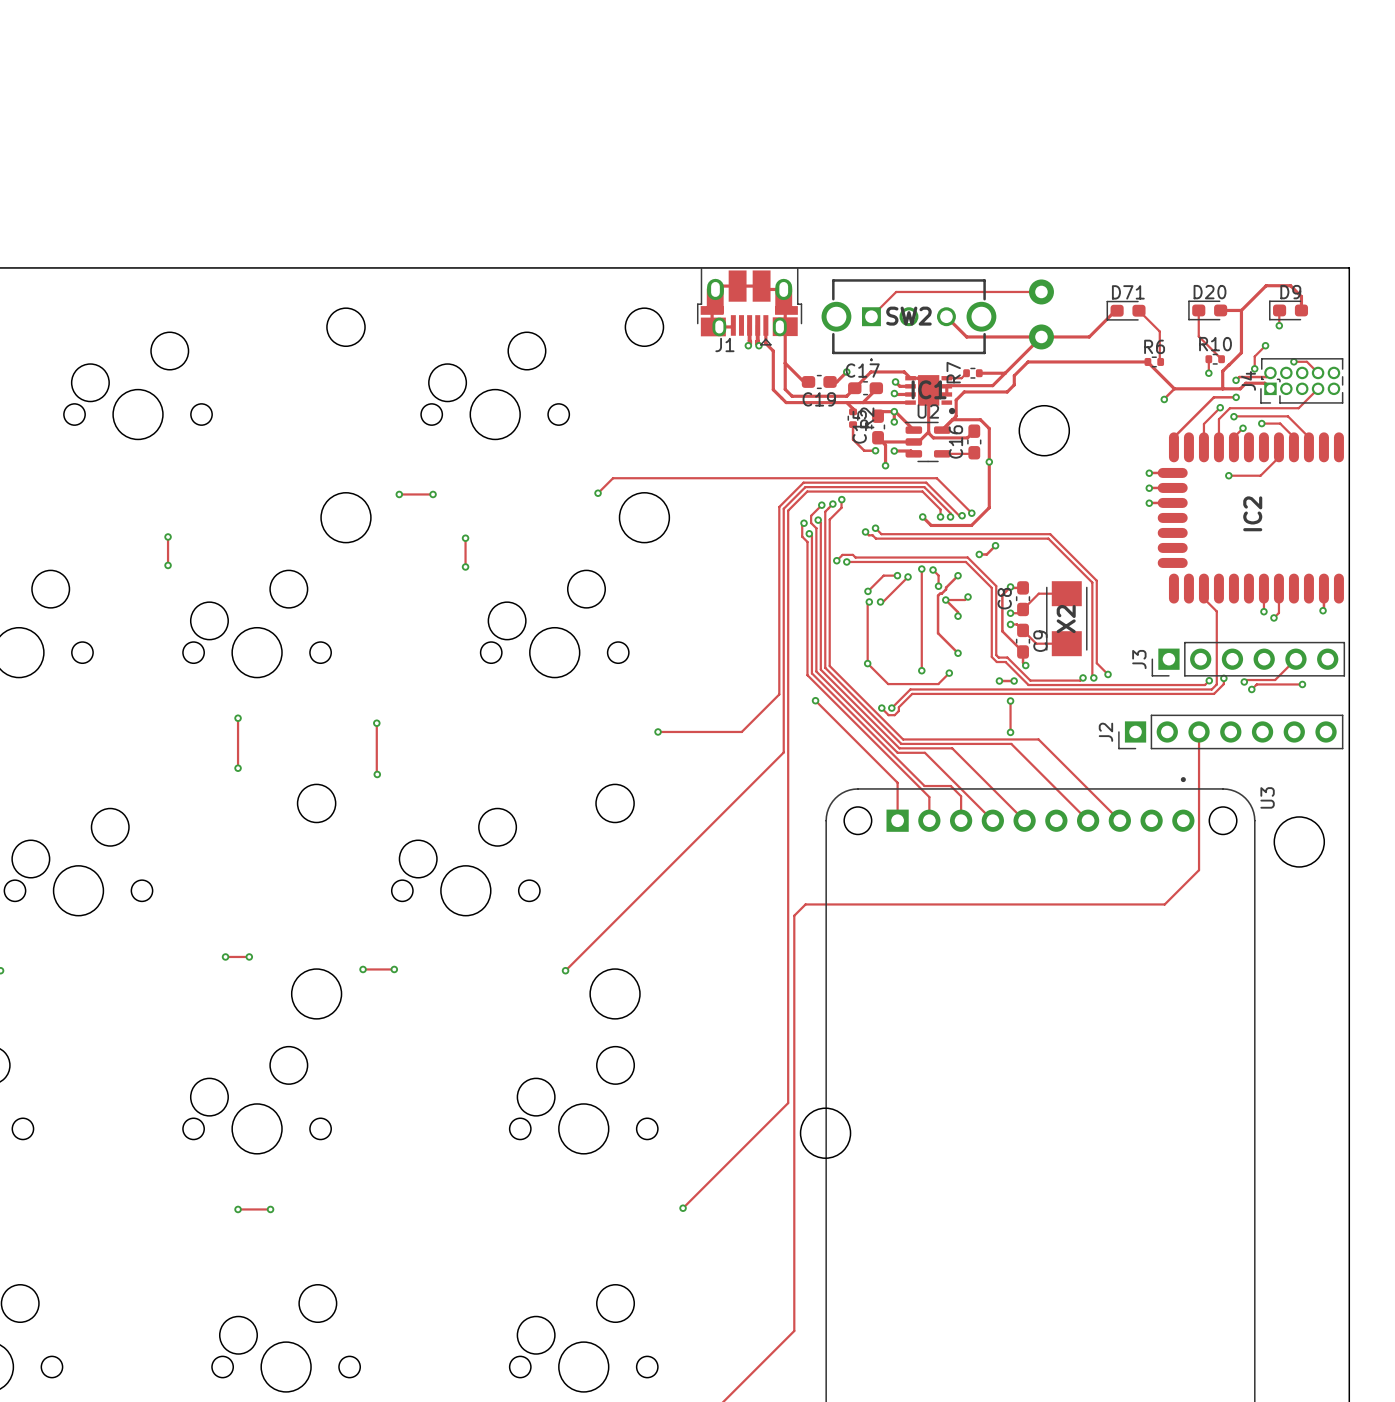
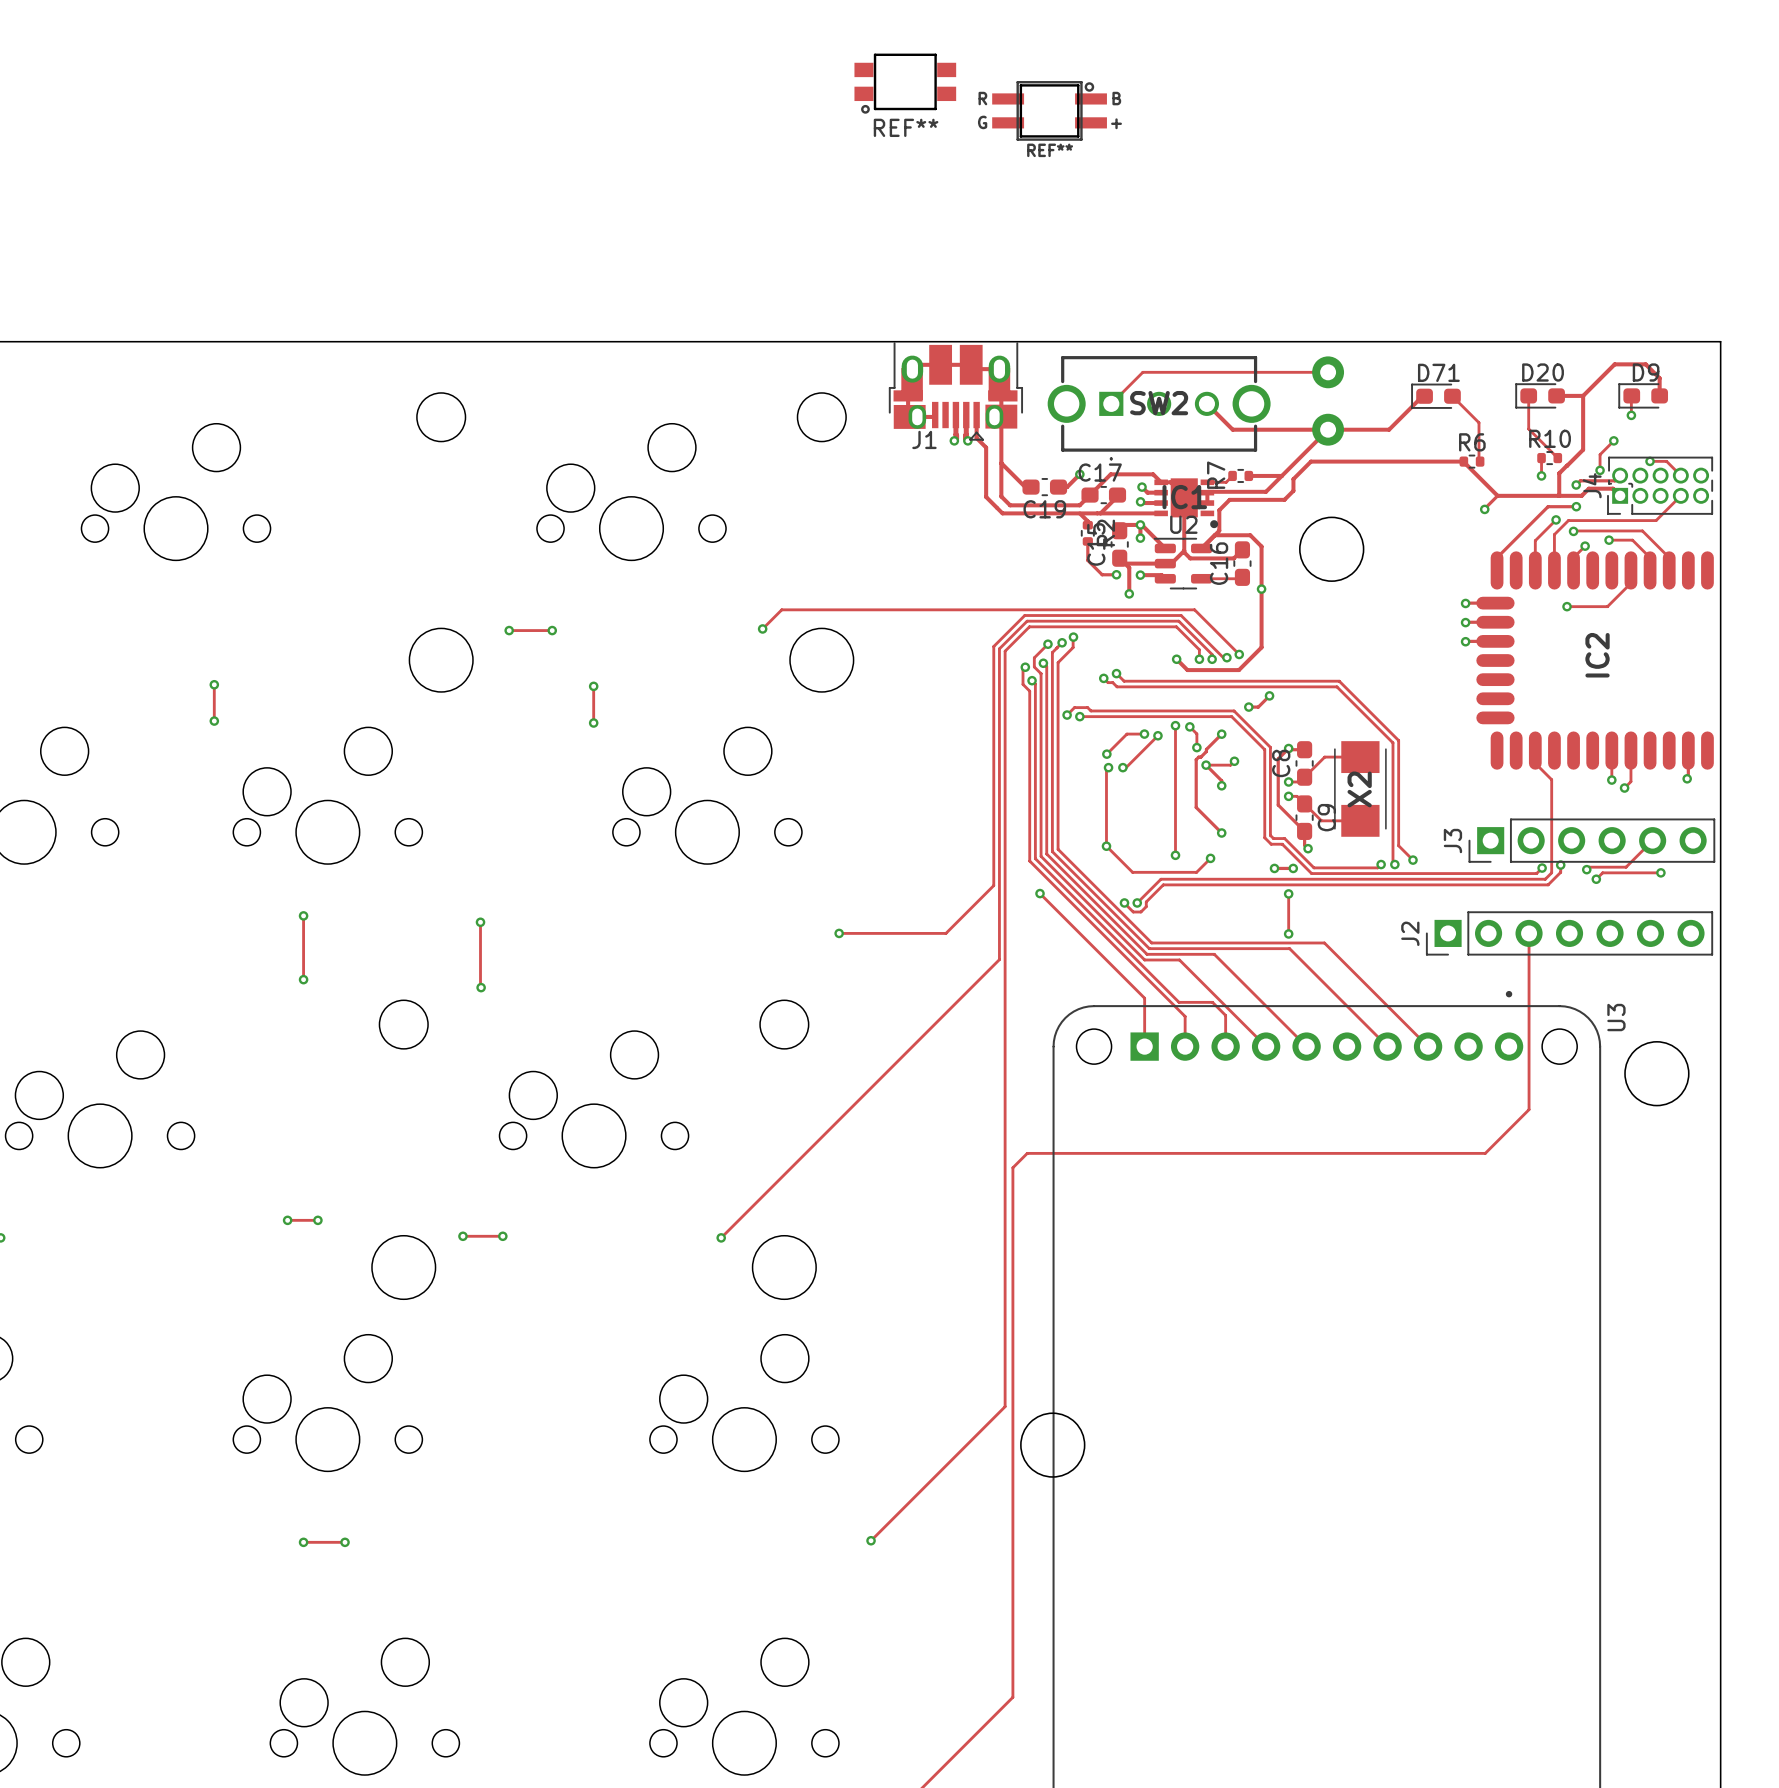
REF**: none -> (905, 83)
REF**: none -> (1049, 110)

